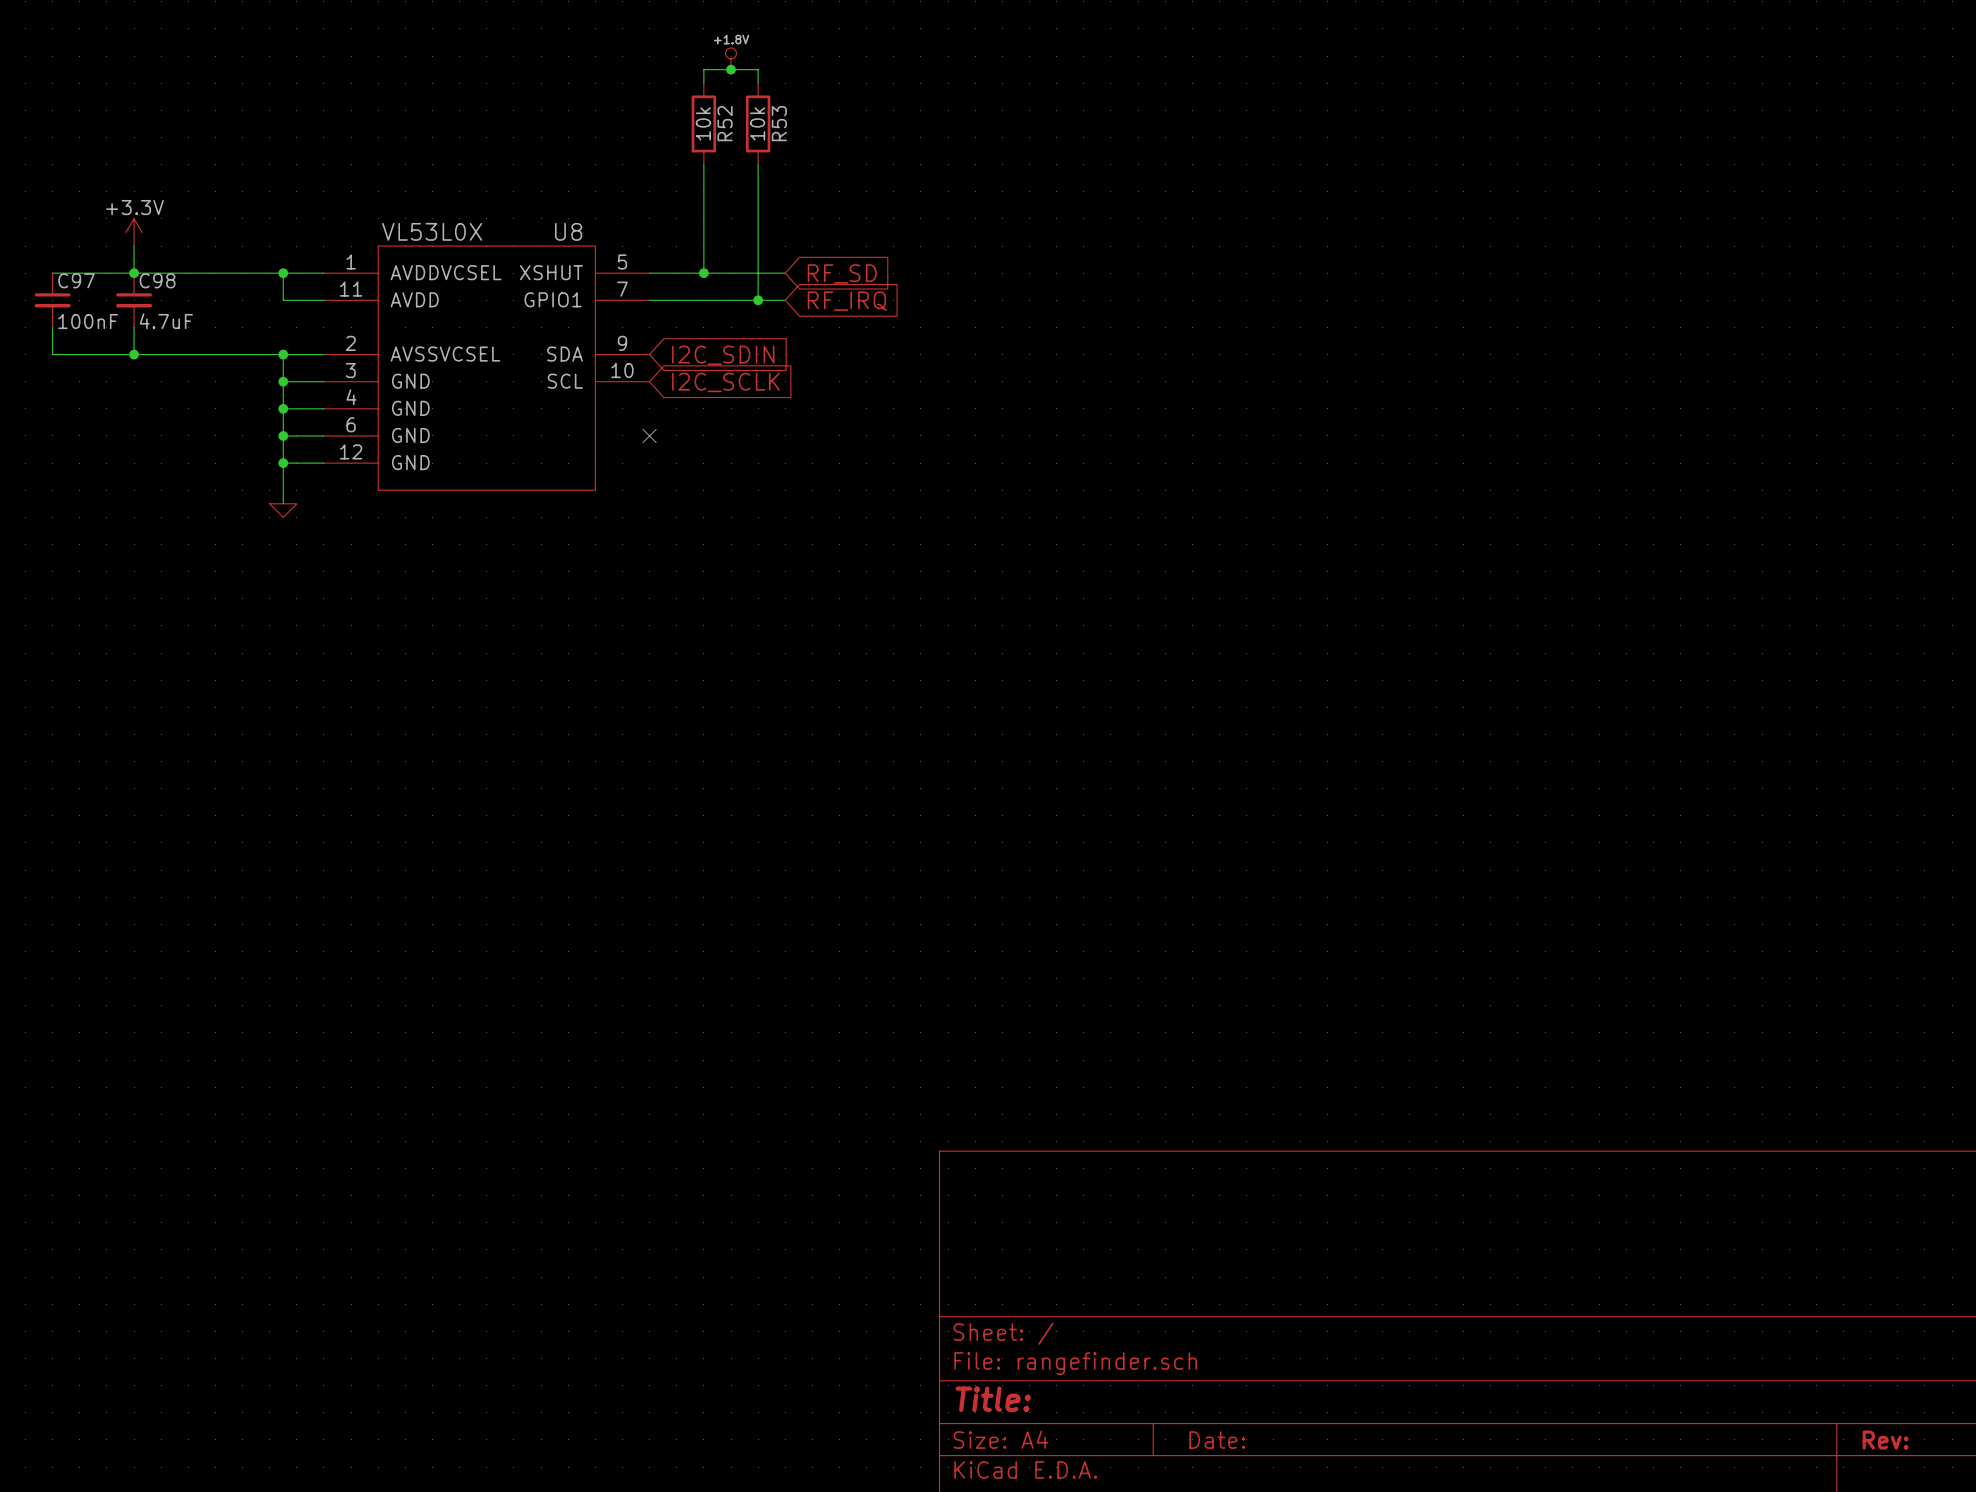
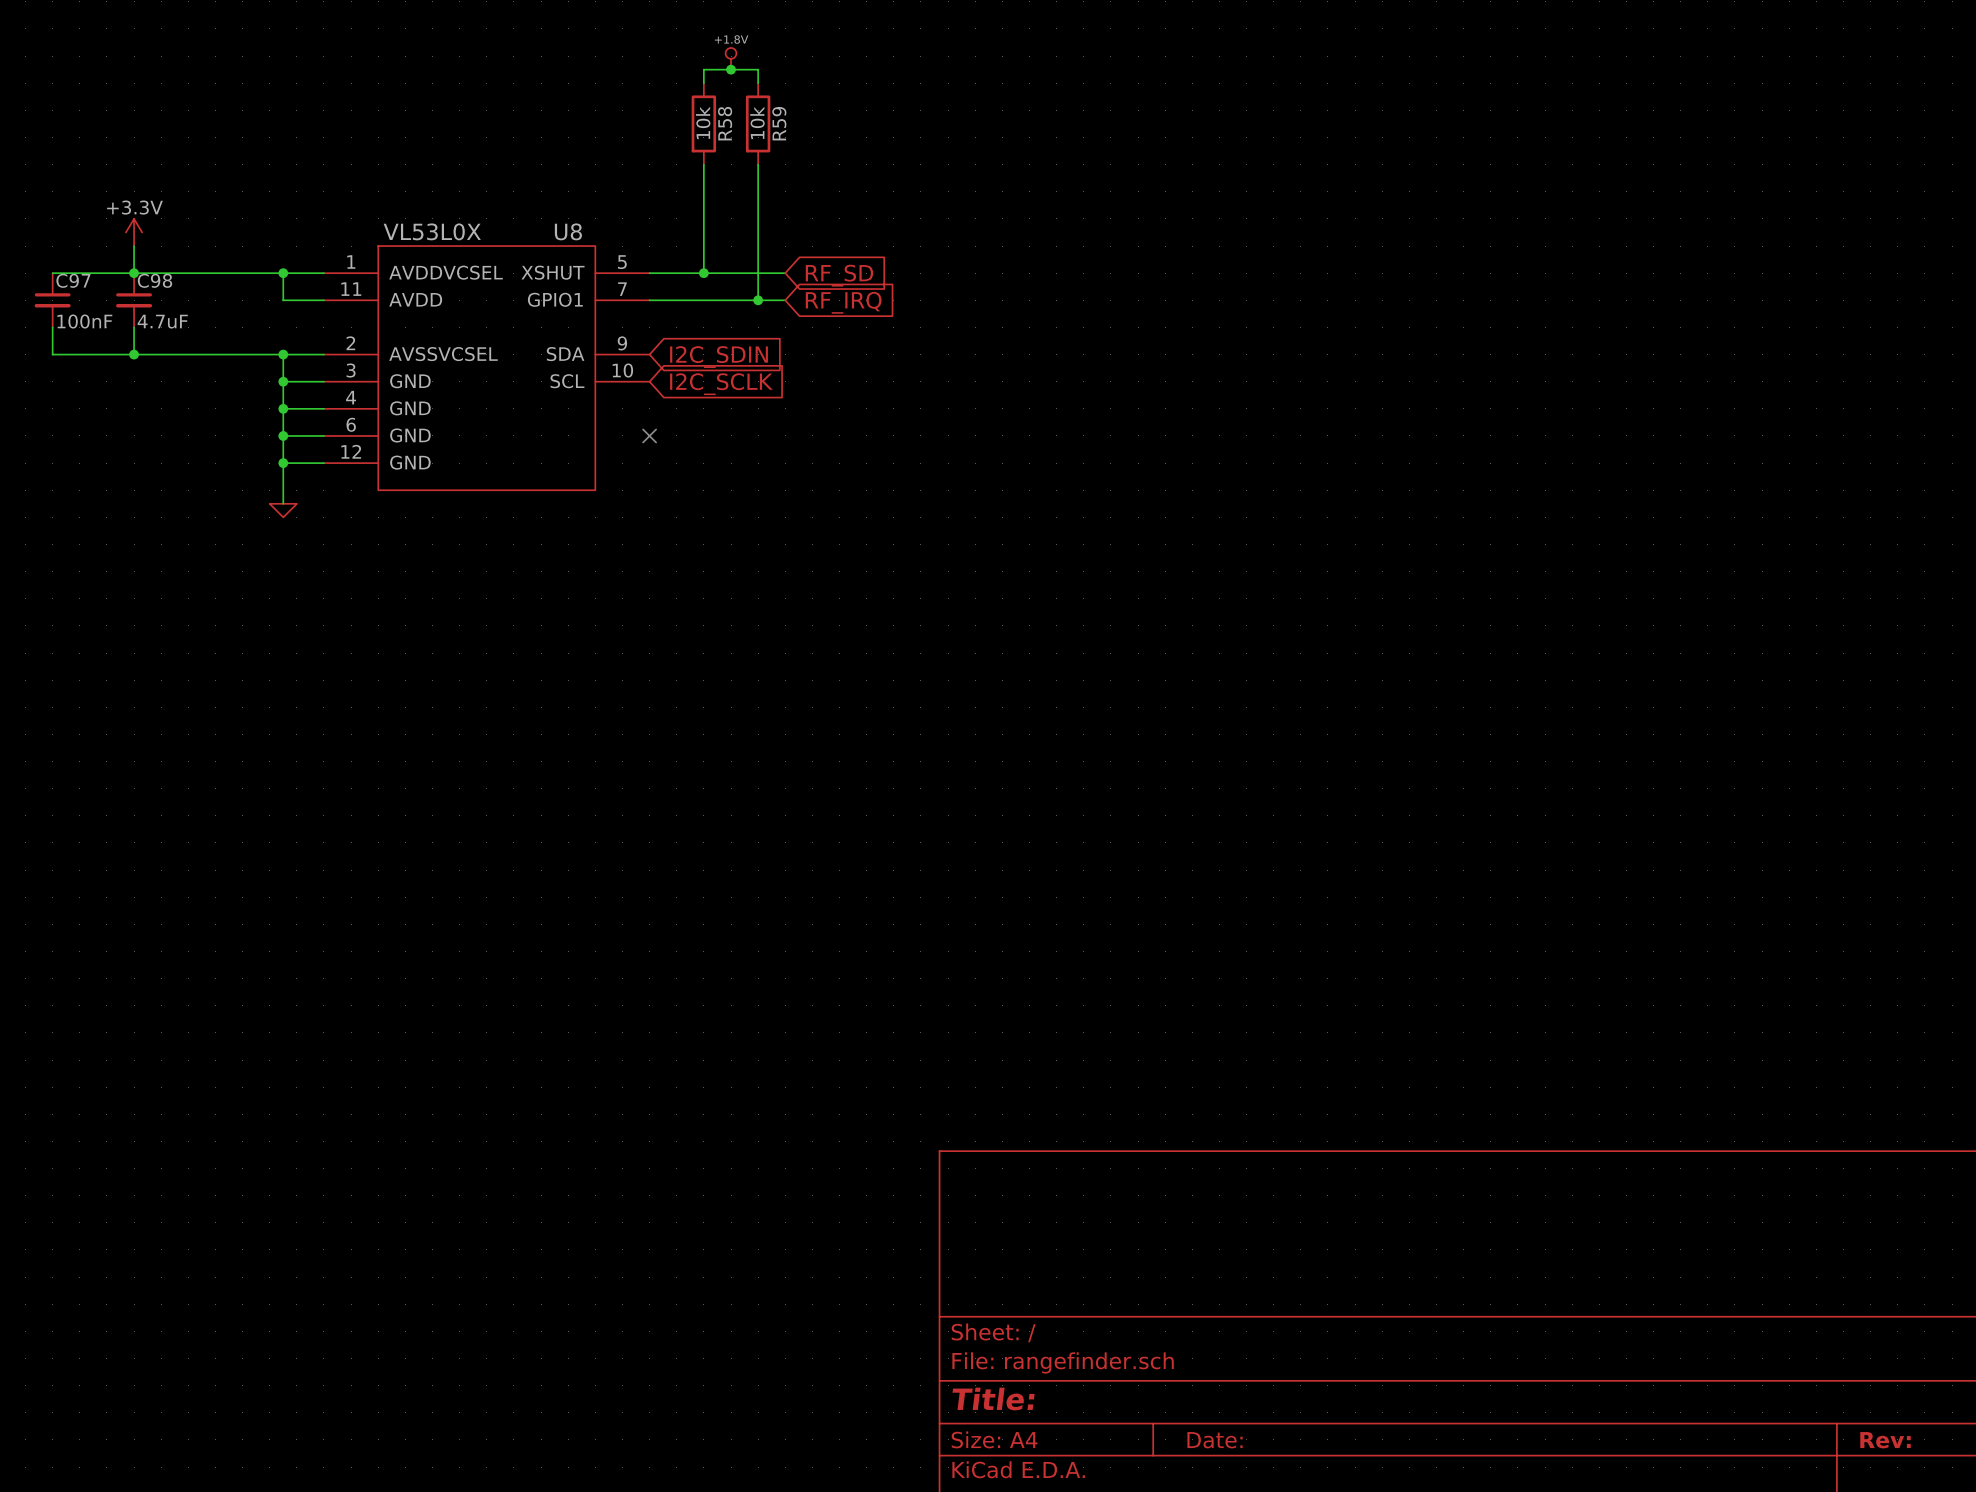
R52 name: R52 (725, 123) -> R58 (725, 123)
R53 name: R53 (779, 123) -> R59 (779, 123)

